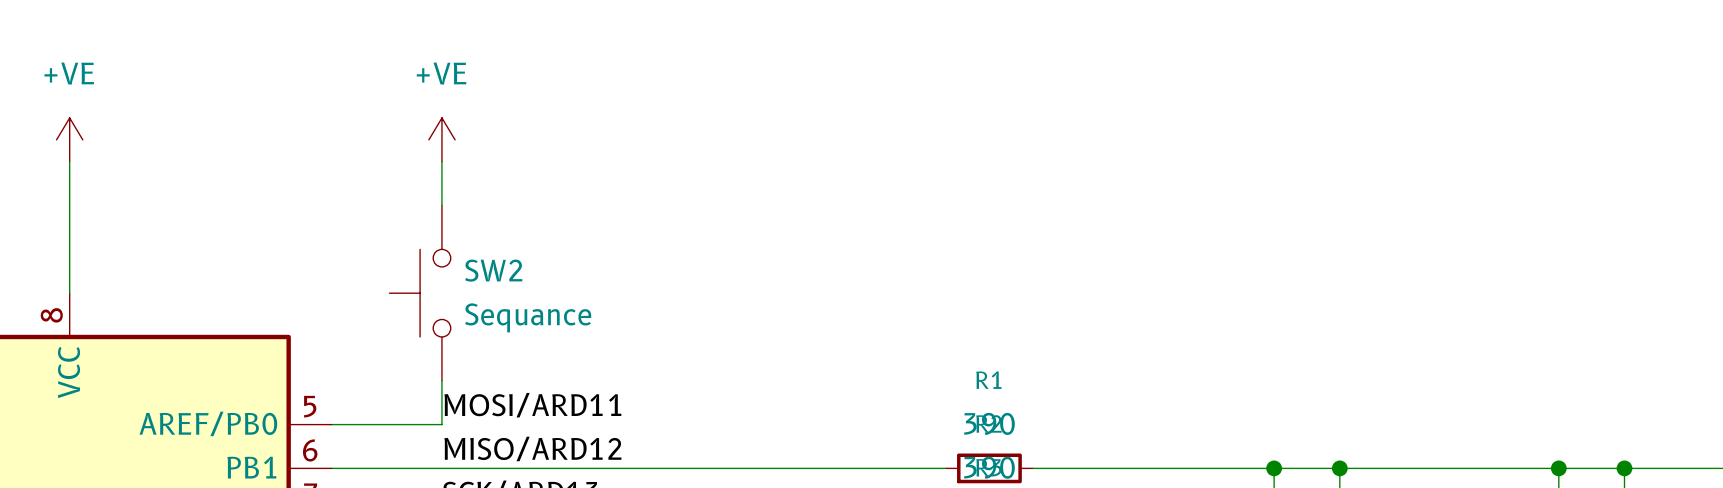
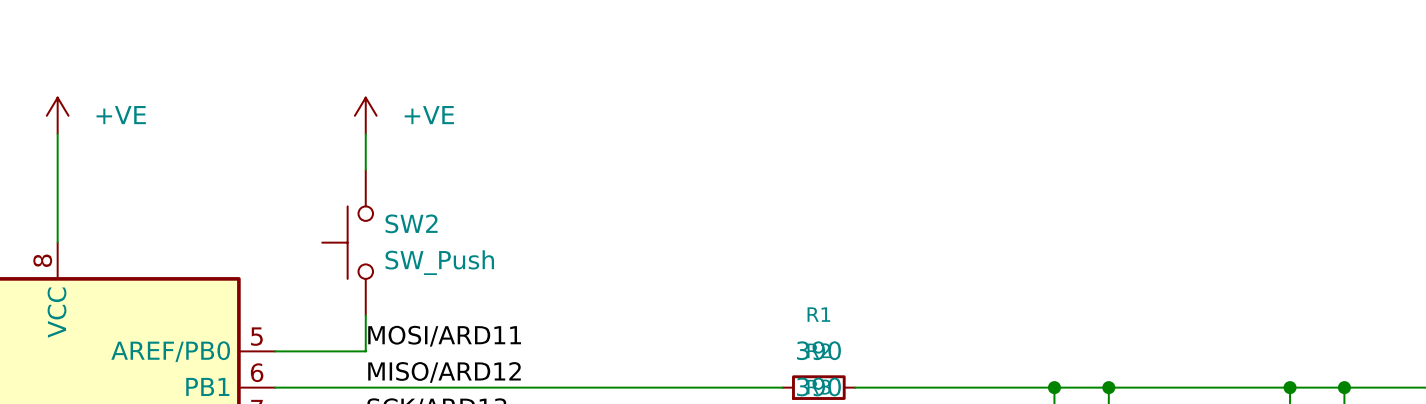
power symbol text position: +VE (69, 73) -> +VE (121, 115)
power symbol text position: +VE (441, 73) -> +VE (429, 115)
SW2 value: Sequance (528, 317) -> SW_Push (439, 262)

